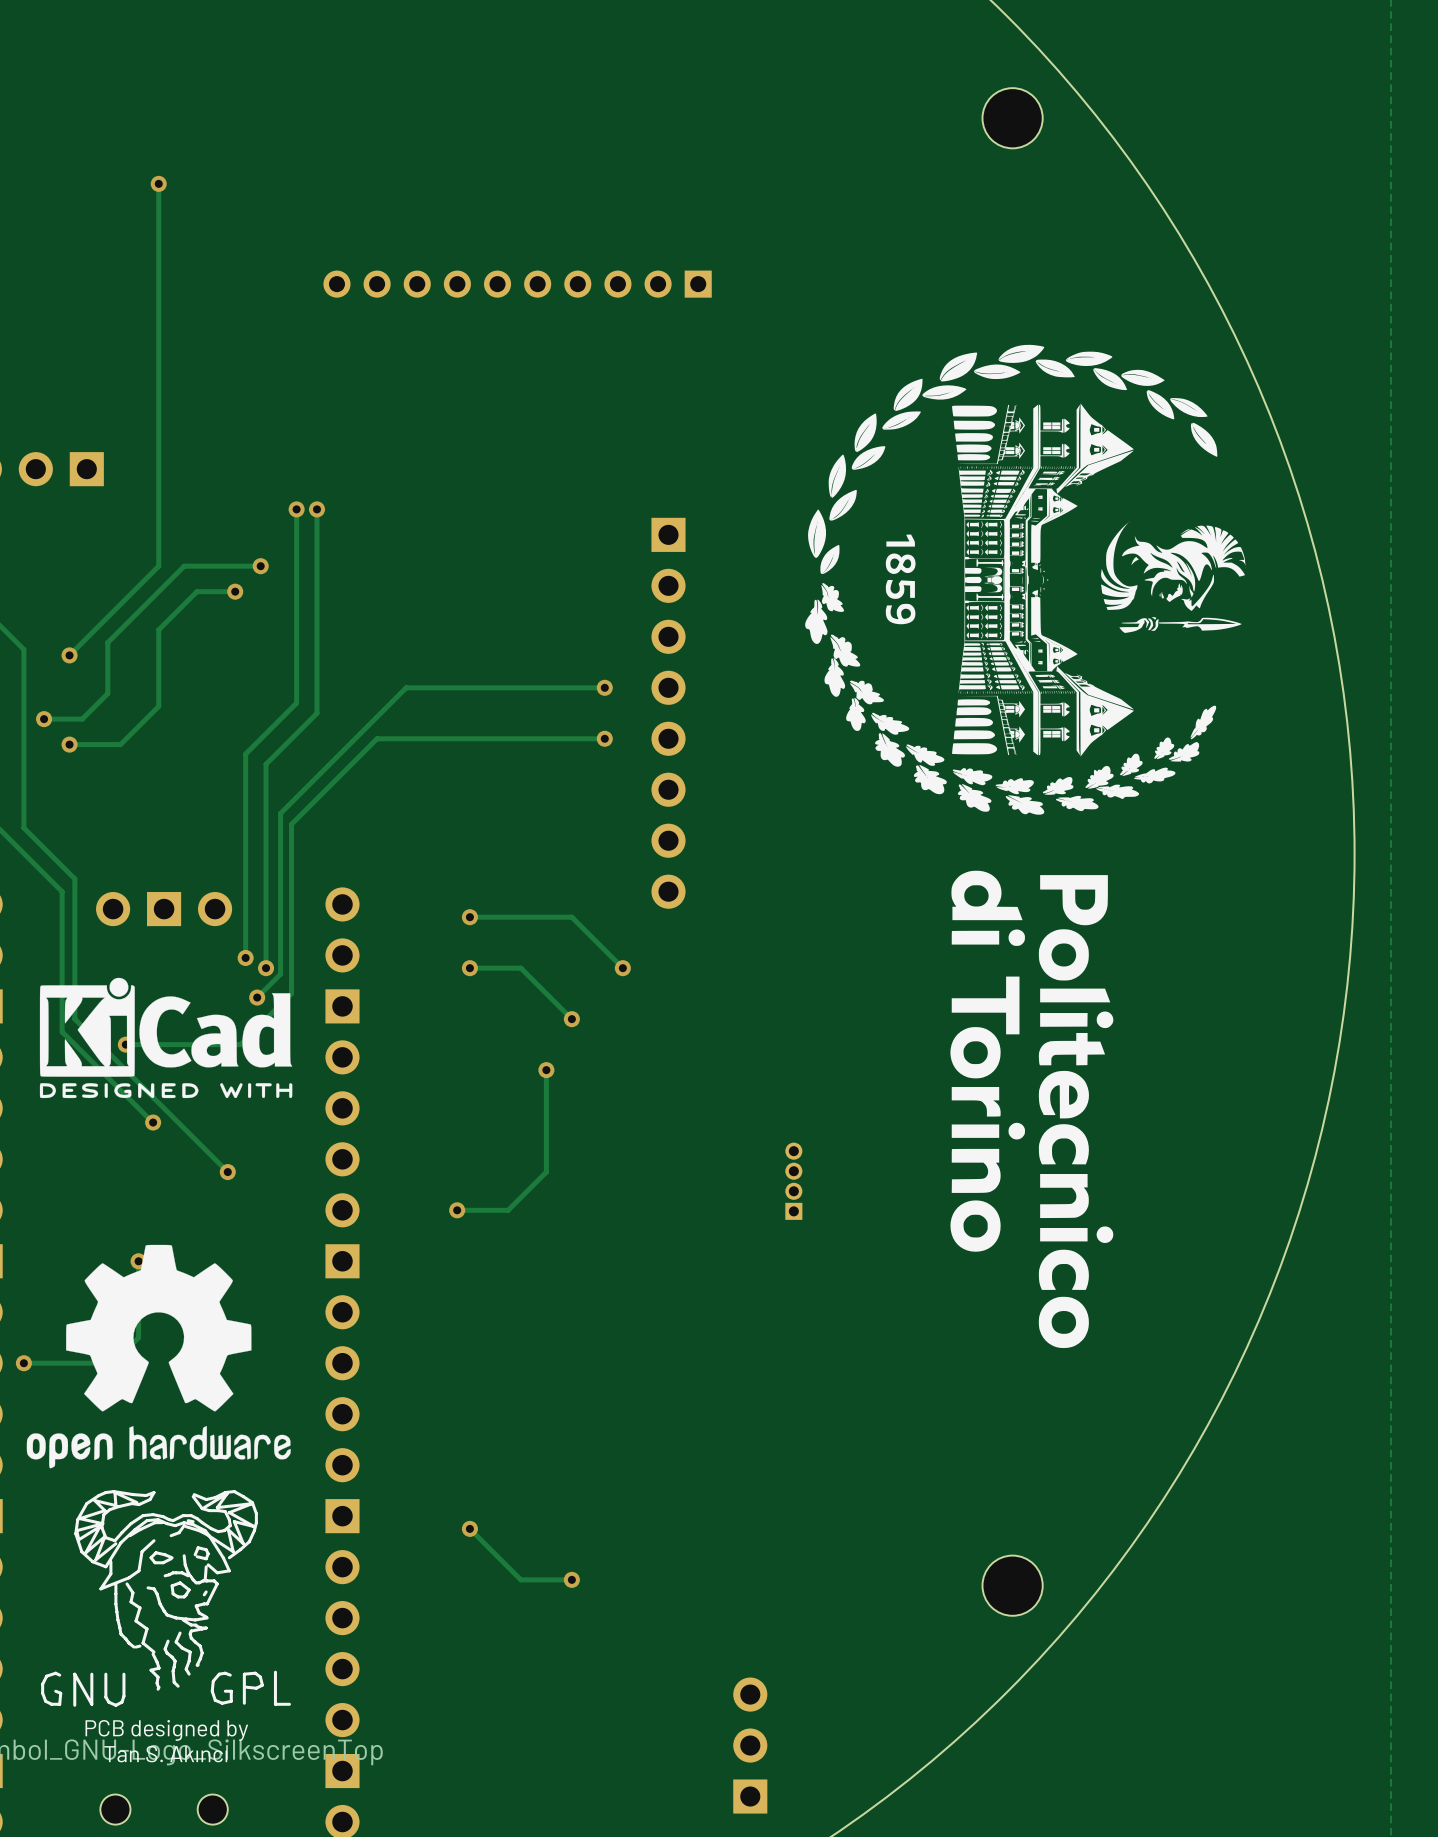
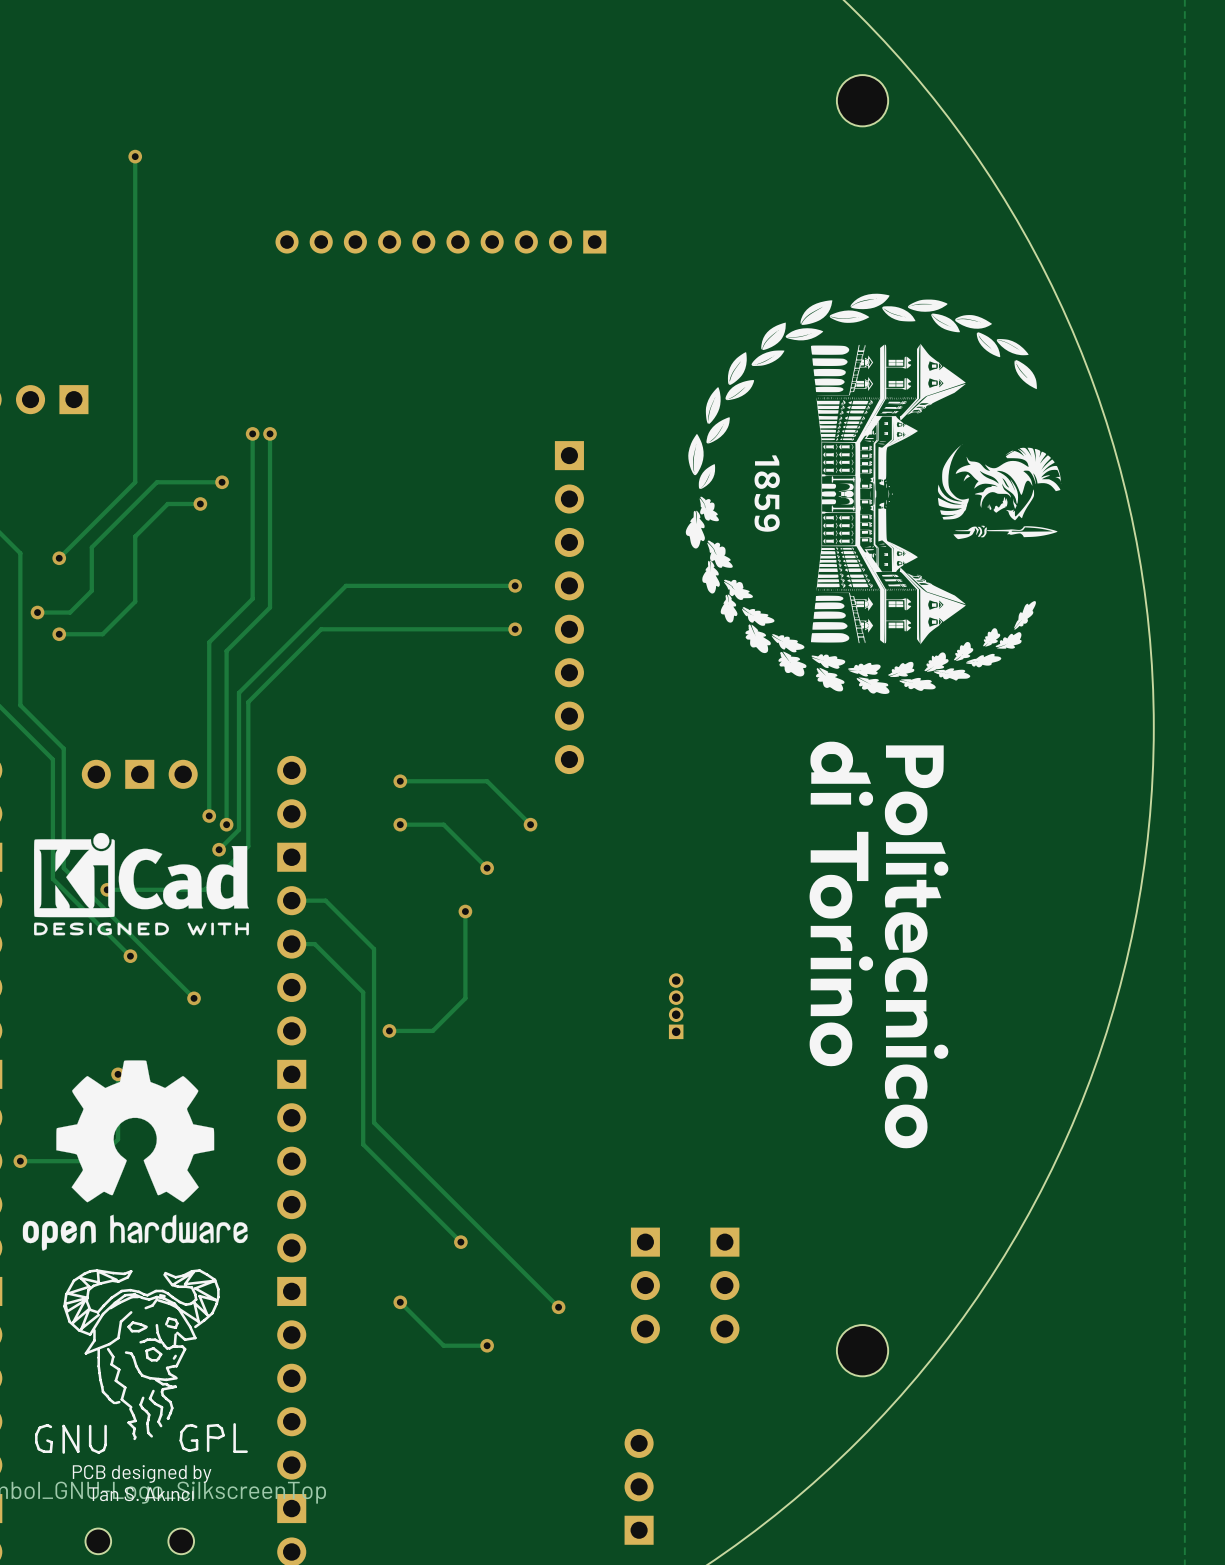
track: none -> (291, 900) (325, 900) (374, 949) (374, 1122) (558, 1307)
track: none -> (291, 944) (314, 944) (363, 992) (363, 1144) (460, 1242)
via: none -> (460, 1242)
part: none -> (645, 1285)
part: none -> (724, 1285)
via: none -> (558, 1307)

